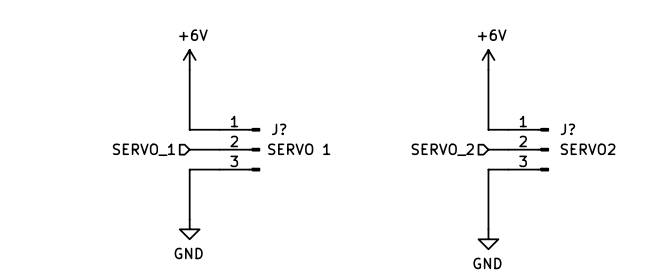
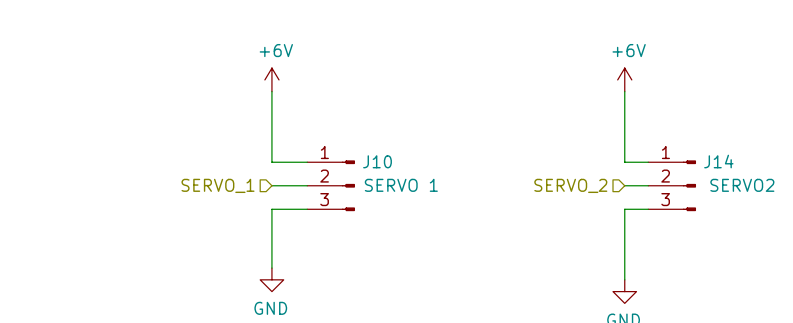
J? name: J? (279, 129) -> J10 (377, 161)
J? name: J? (567, 129) -> J14 (718, 161)

